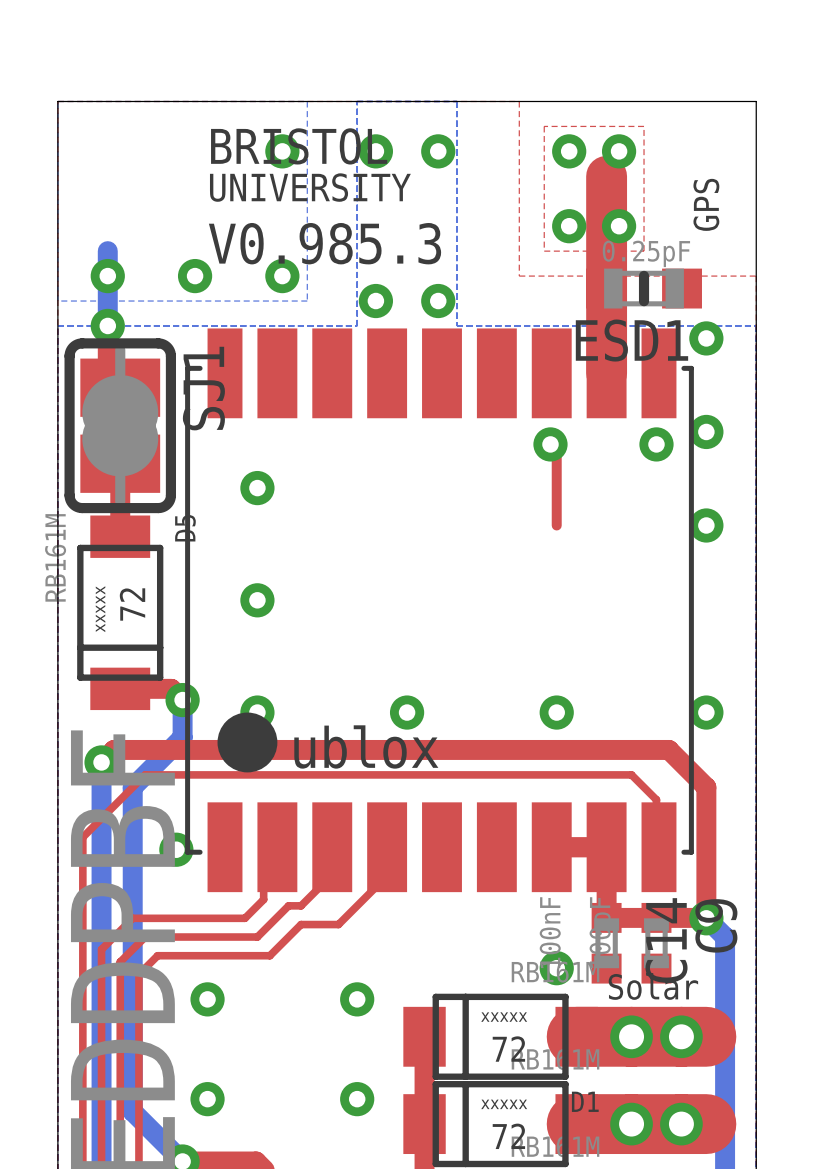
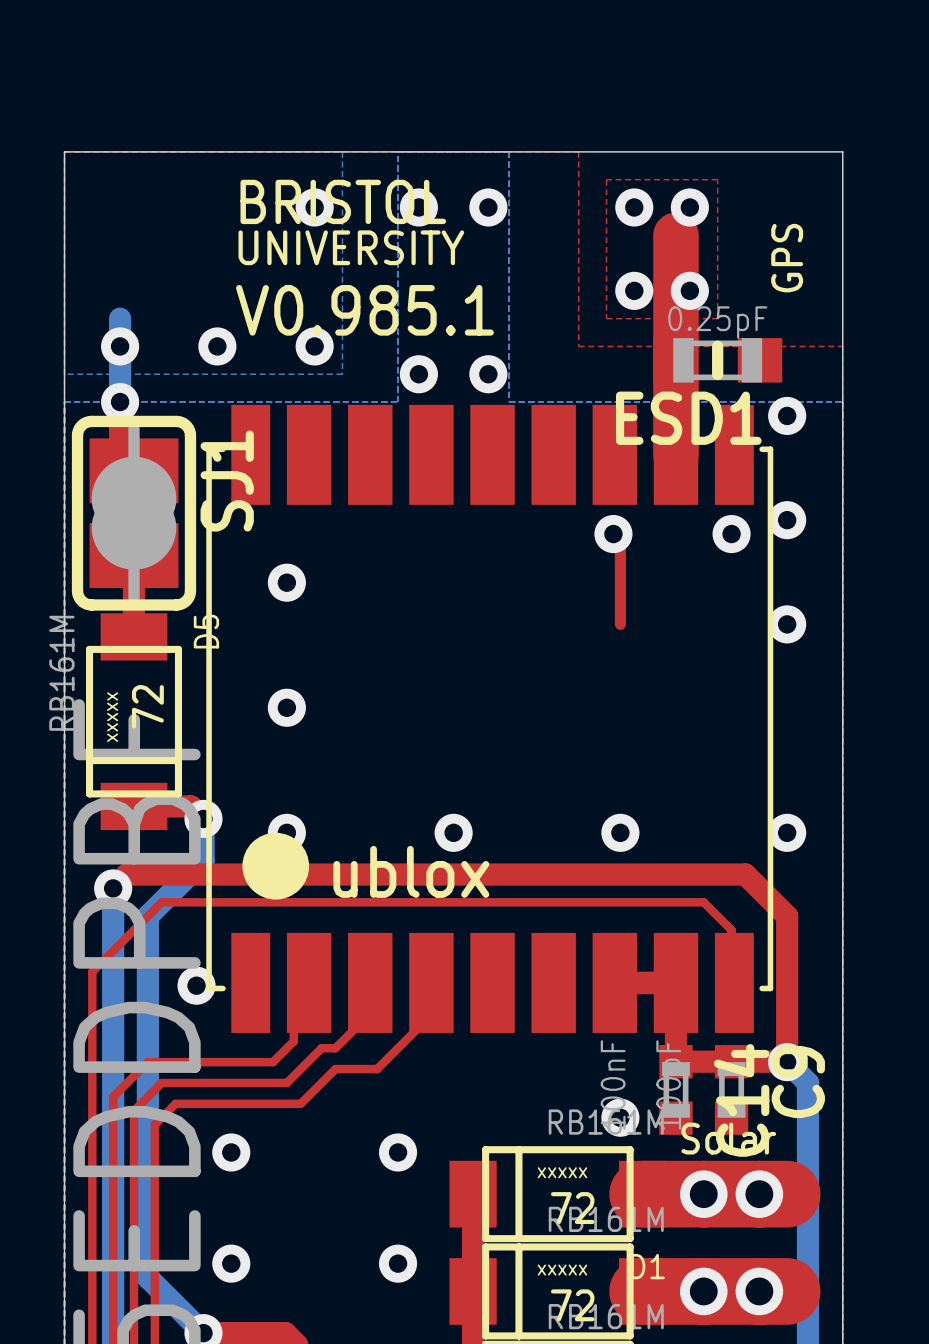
text: V0.985.3 (325, 243) -> V0.985.1 (364, 310)

